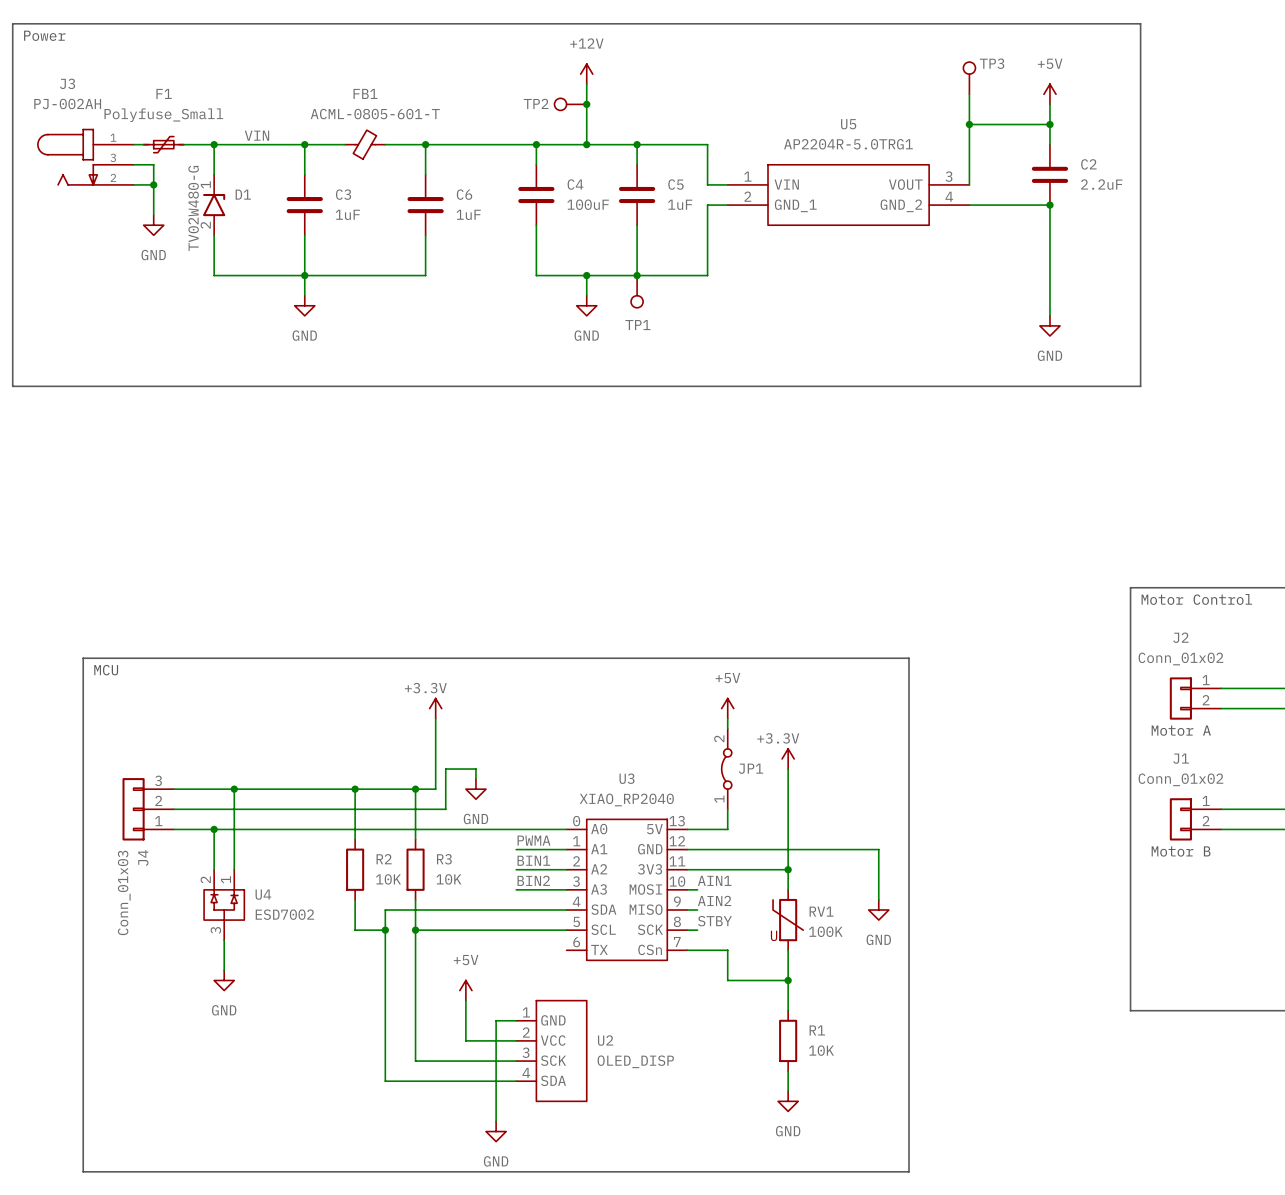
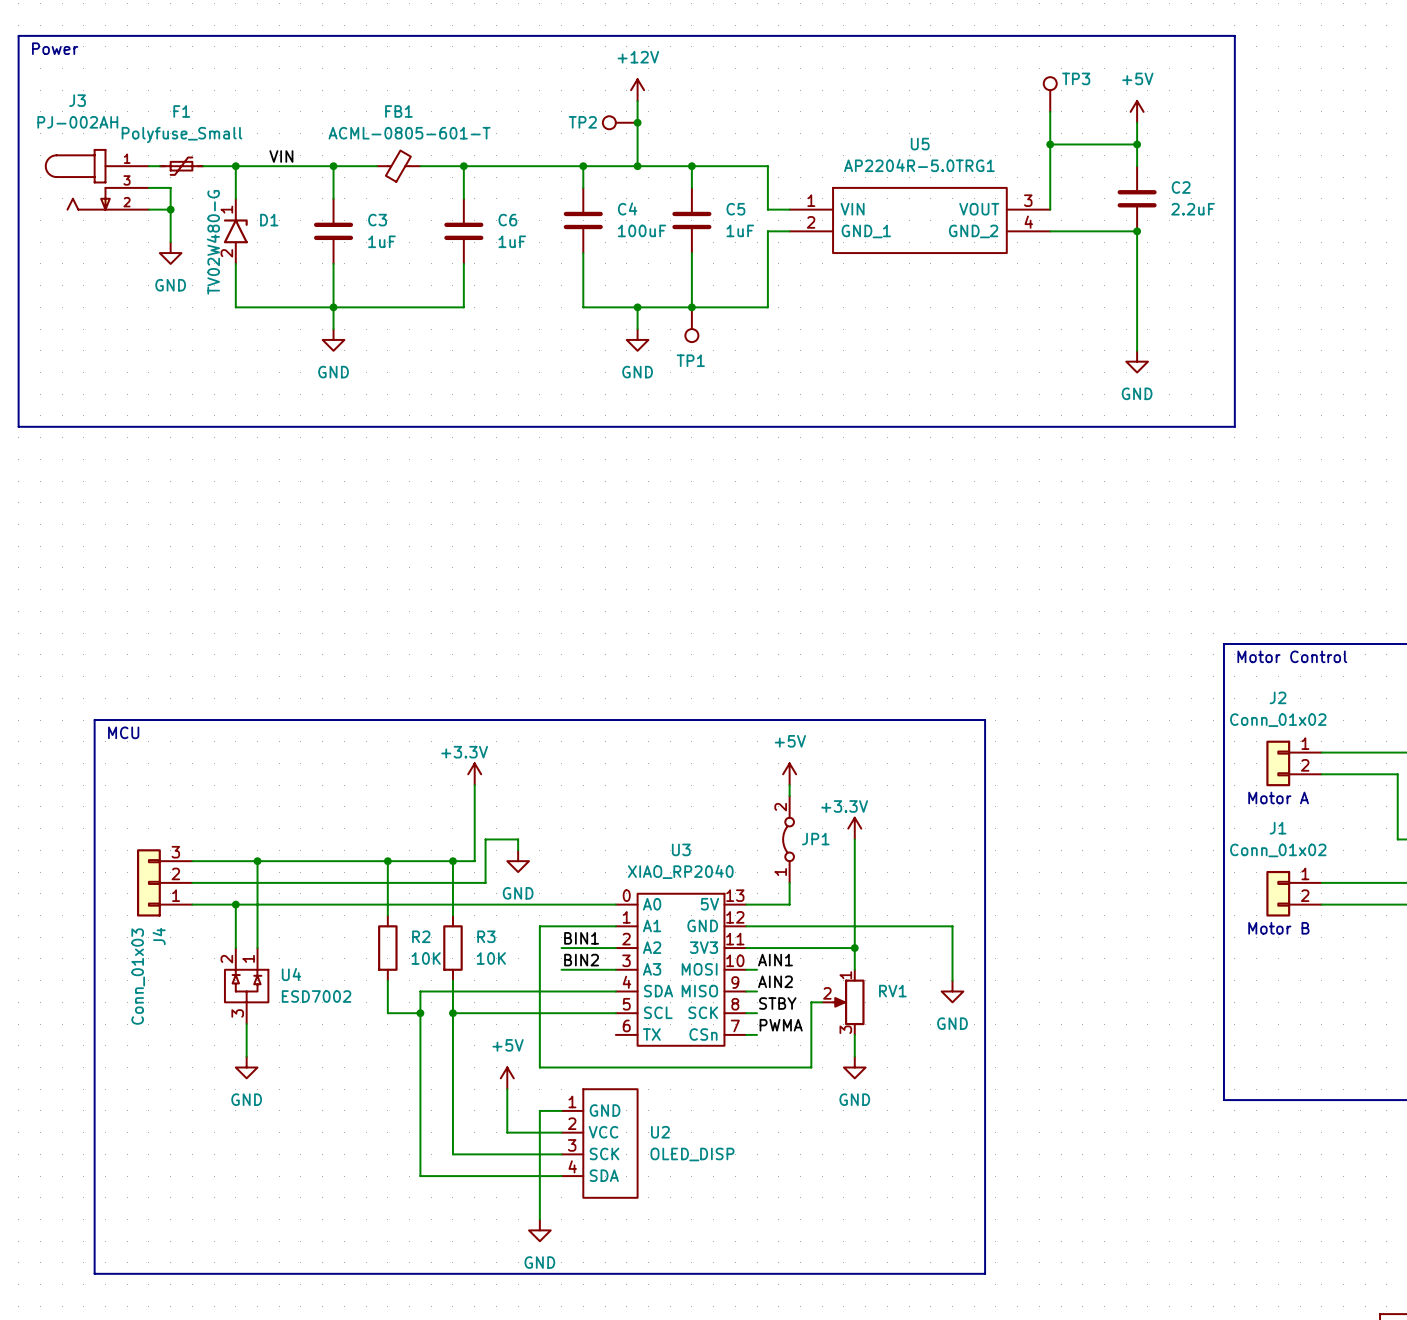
label: PWMA (533, 840) -> none
RV1 symbol: [773, 889, 804, 951] -> [822, 969, 865, 1035]
RV1 value: 100K (825, 931) -> none
label: none -> PWMA (781, 1025)
wire: (697, 950) (727, 950) (727, 980) -> (561, 926) (539, 926) (539, 1067) (789, 1067)
wire: (788, 970) (788, 1010) -> none
wire: (747, 980) (788, 980) -> (811, 1067) (811, 1002) (822, 1002)
junction: (788, 980) -> none
R1: 10K (788, 1040) -> none
wire: (788, 1071) (788, 1091) -> none
power symbol position: GND (788, 1101) -> GND (854, 1067)

